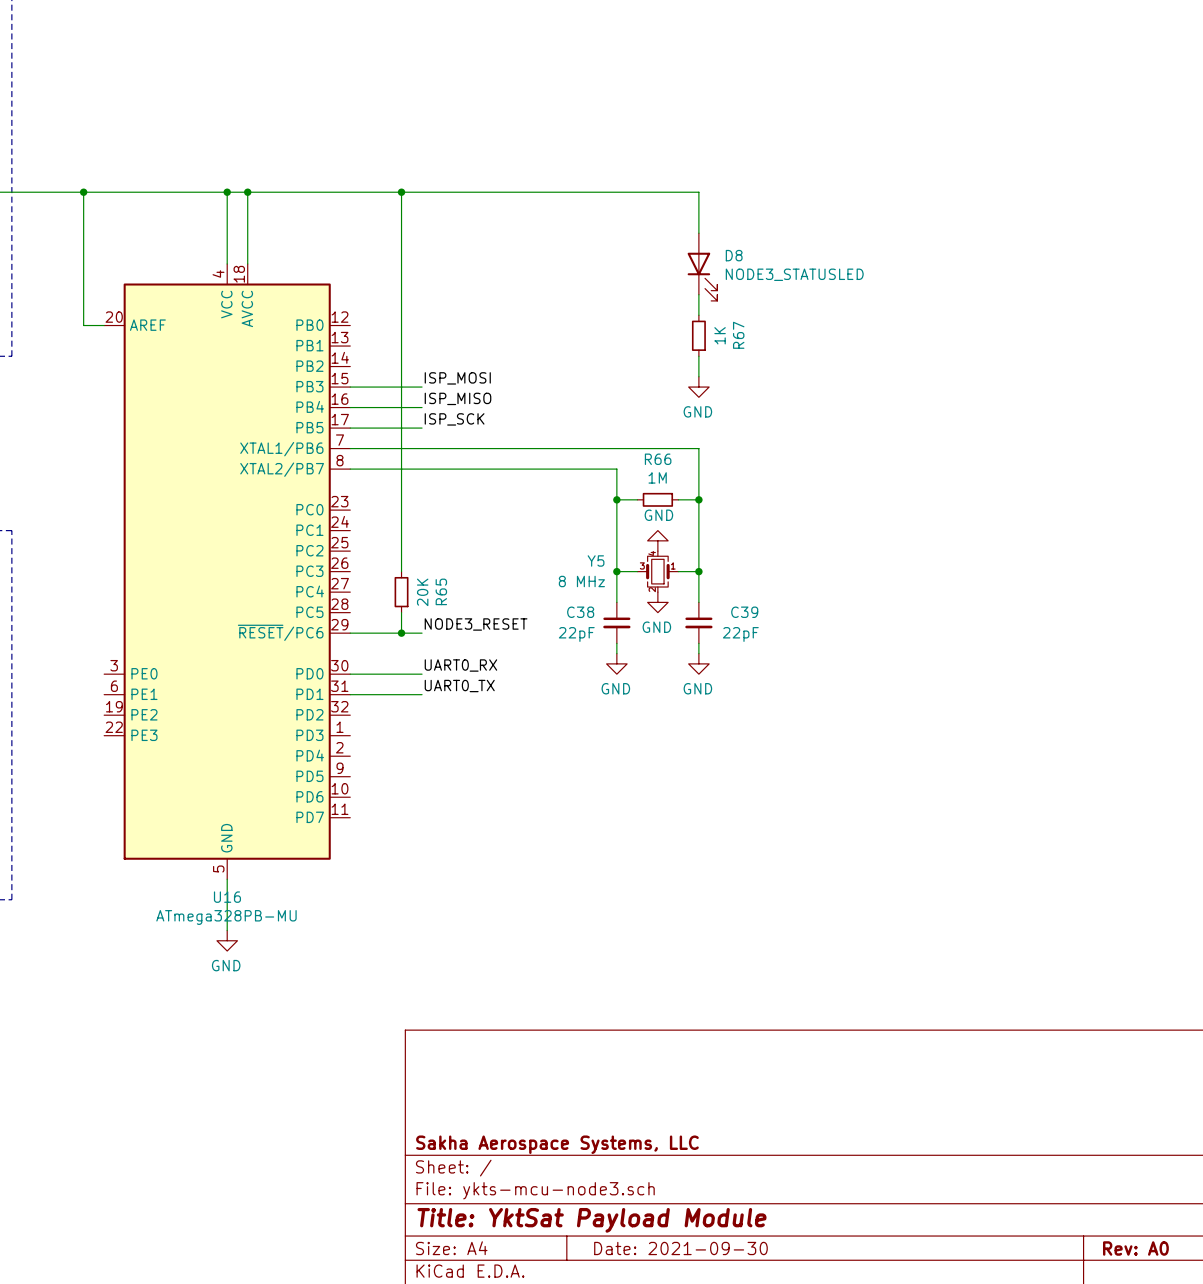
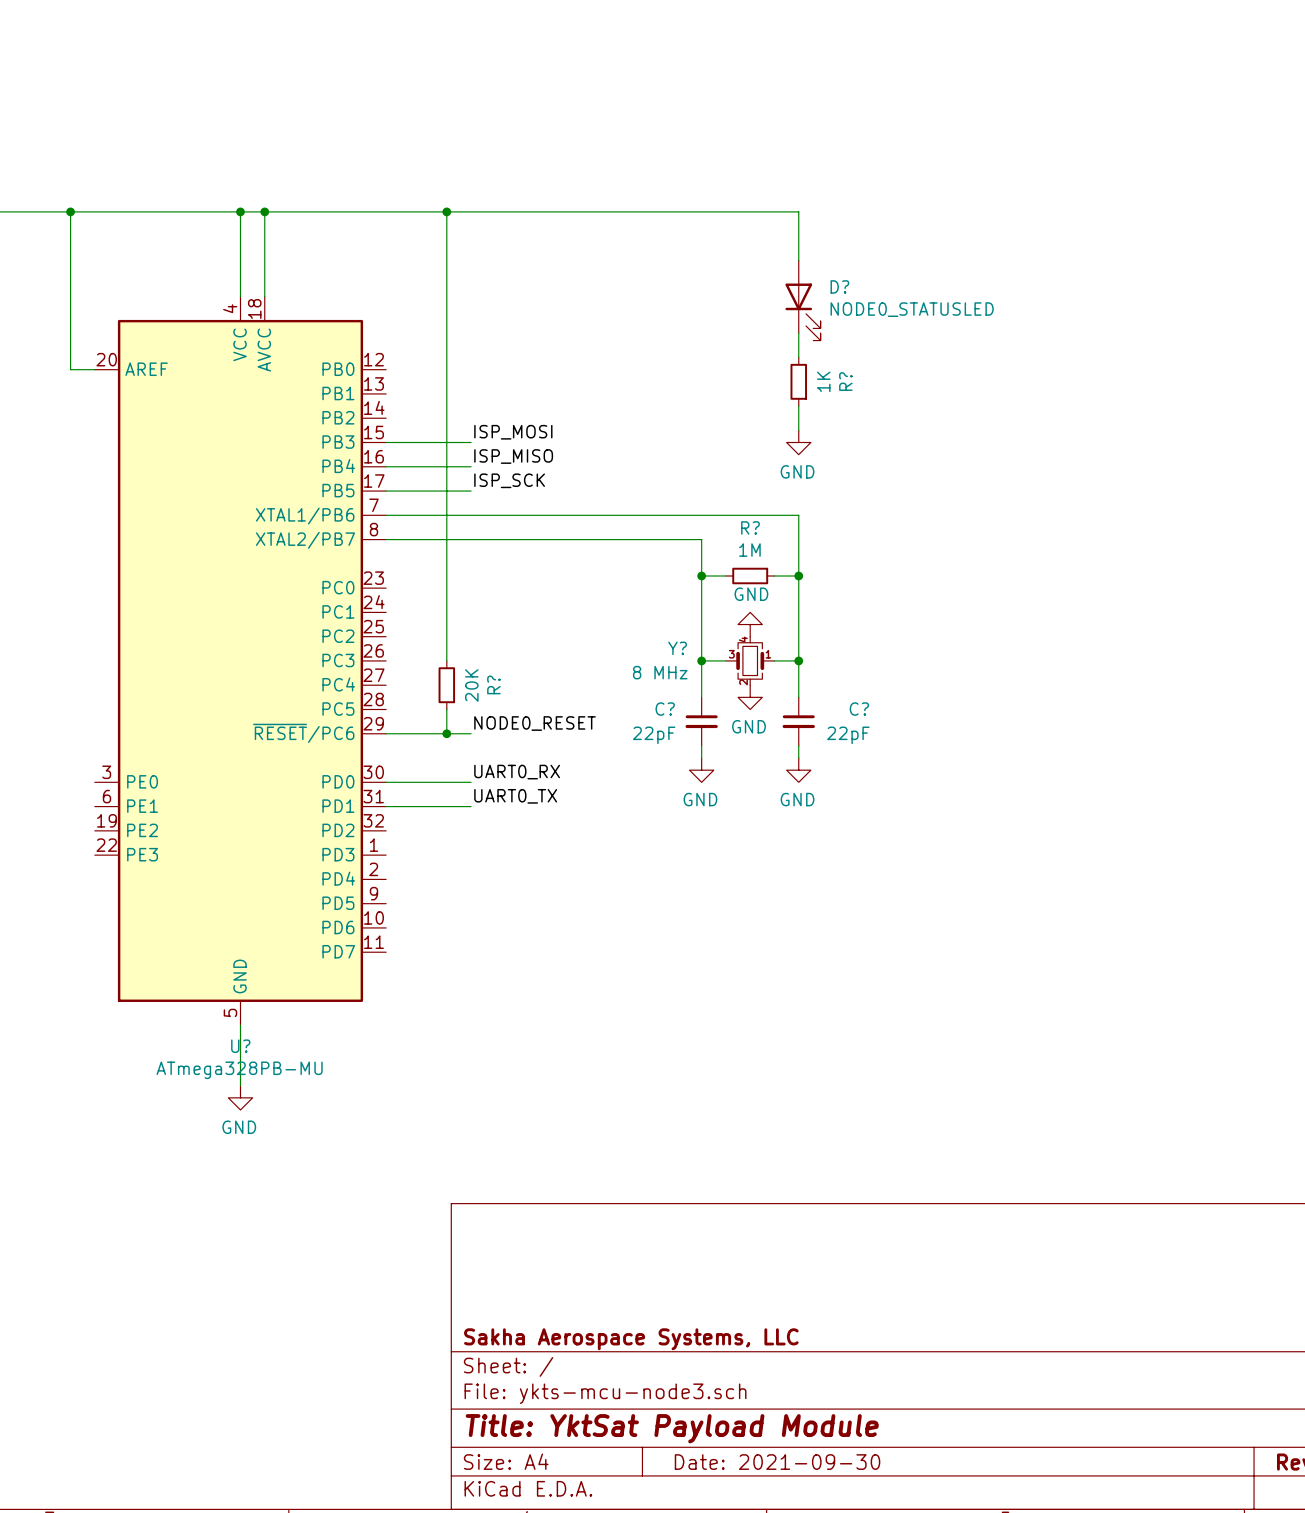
D8 name: D8 (734, 255) -> D? (839, 286)
D8 value: NODE3_STATUSLED (794, 274) -> NODE0_STATUSLED (912, 309)
R67 name: R67 (738, 335) -> R? (845, 381)
R66 name: R66 (658, 459) -> R? (750, 527)
Y5 name: Y5 (596, 560) -> Y? (677, 648)
R65 name: R65 (441, 591) -> R? (493, 684)
C38 name: C38 (580, 612) -> C? (665, 709)
C39 name: C39 (744, 612) -> C? (859, 709)
label: NODE3_RESET (476, 624) -> NODE0_RESET (535, 723)
U16 name: U16 (227, 897) -> U? (240, 1046)

